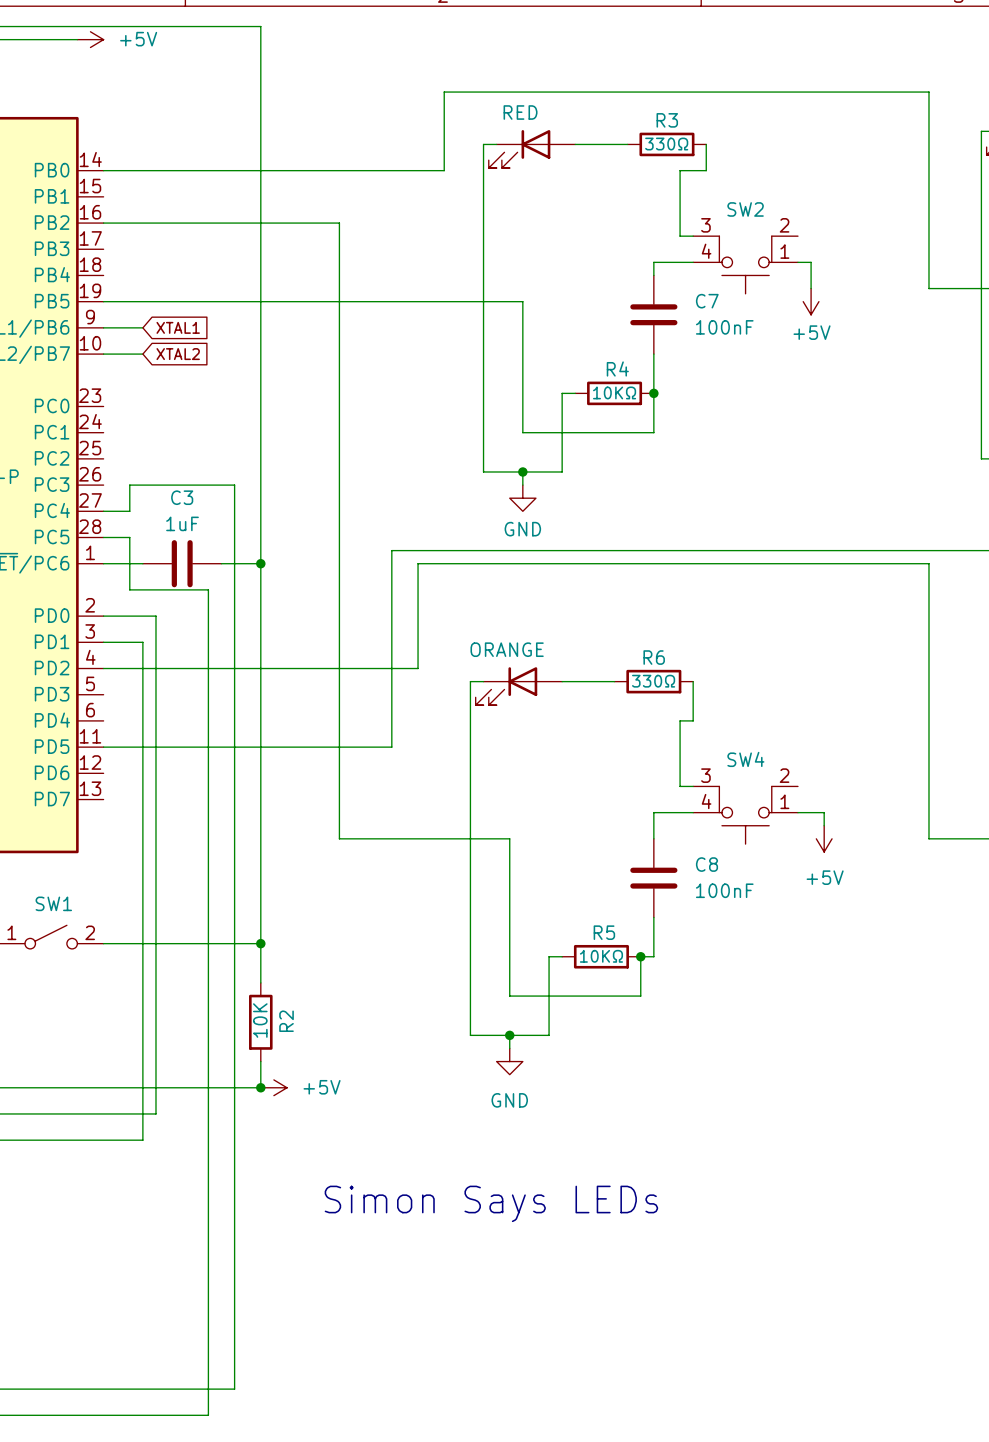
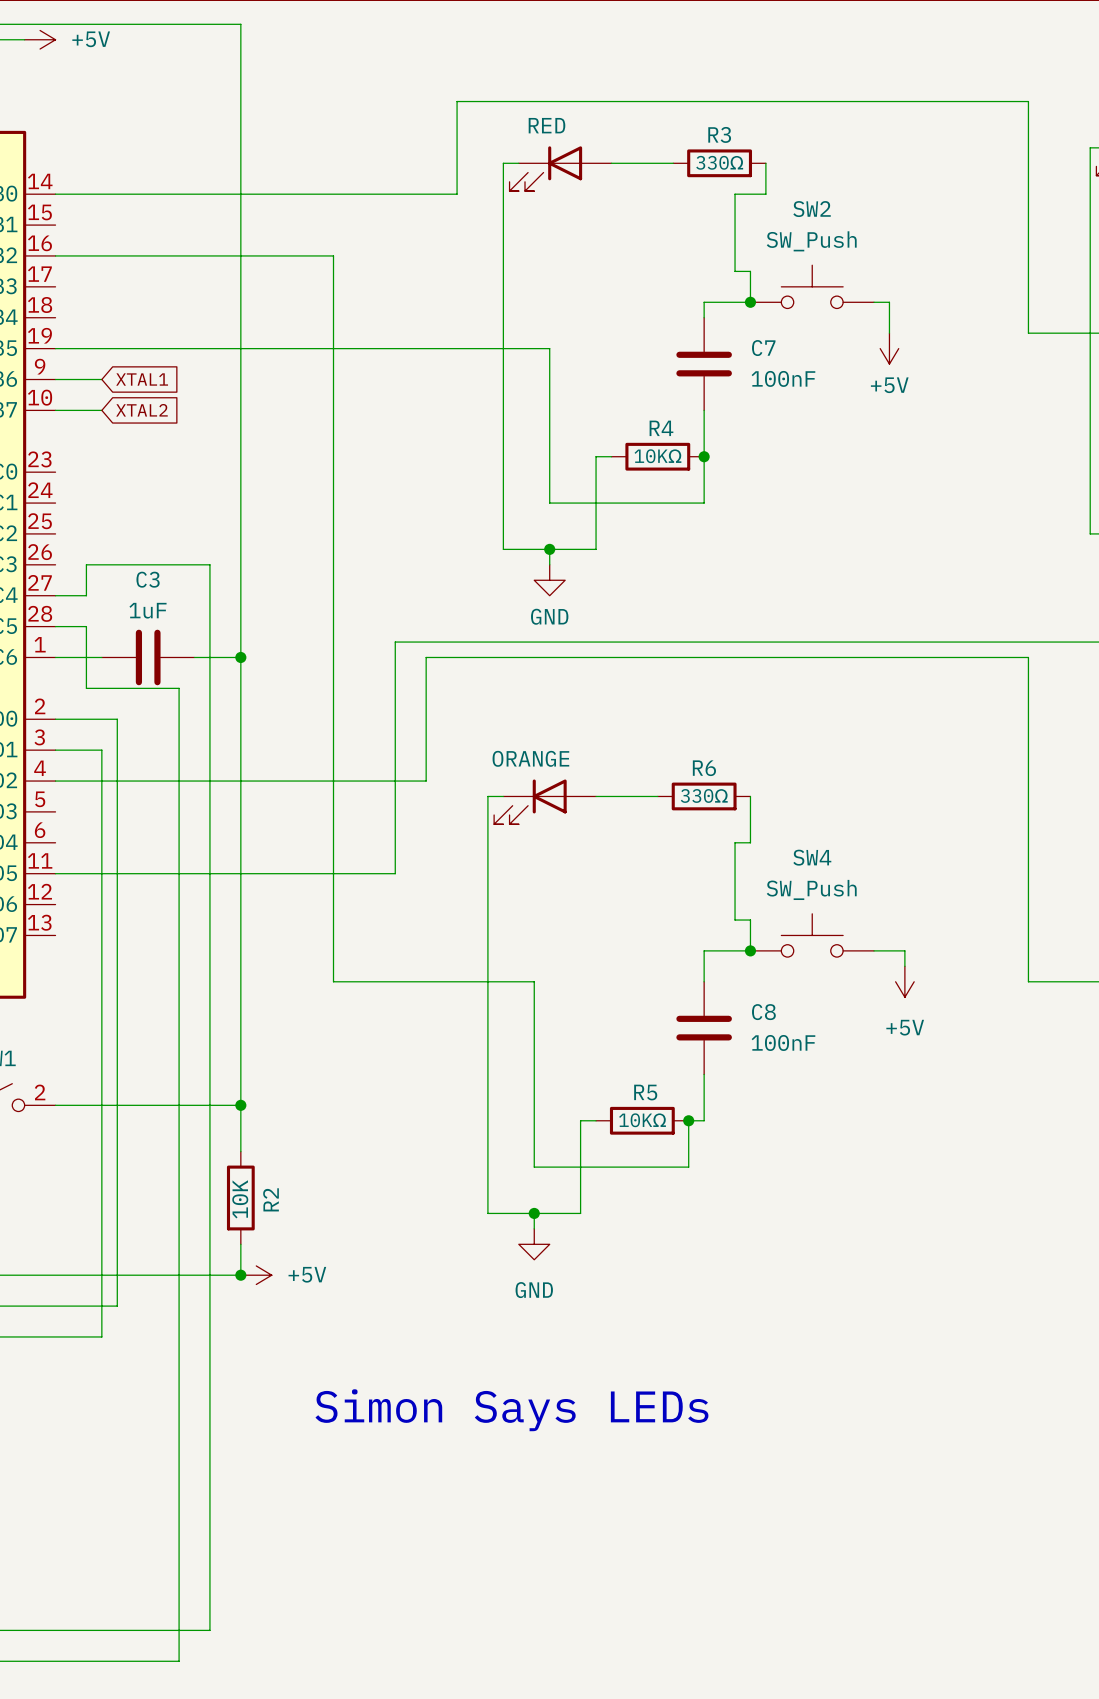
SW2 value: none -> SW_Push (811, 241)
wire: none -> (750, 271) (750, 302)
SW2 symbol: [693, 236, 798, 294] -> [750, 265, 875, 309]
junction: none -> (750, 302)
SW4 value: none -> SW_Push (811, 889)
wire: none -> (750, 920) (750, 950)
SW4 symbol: [693, 786, 798, 845] -> [750, 913, 875, 958]
junction: none -> (750, 950)

